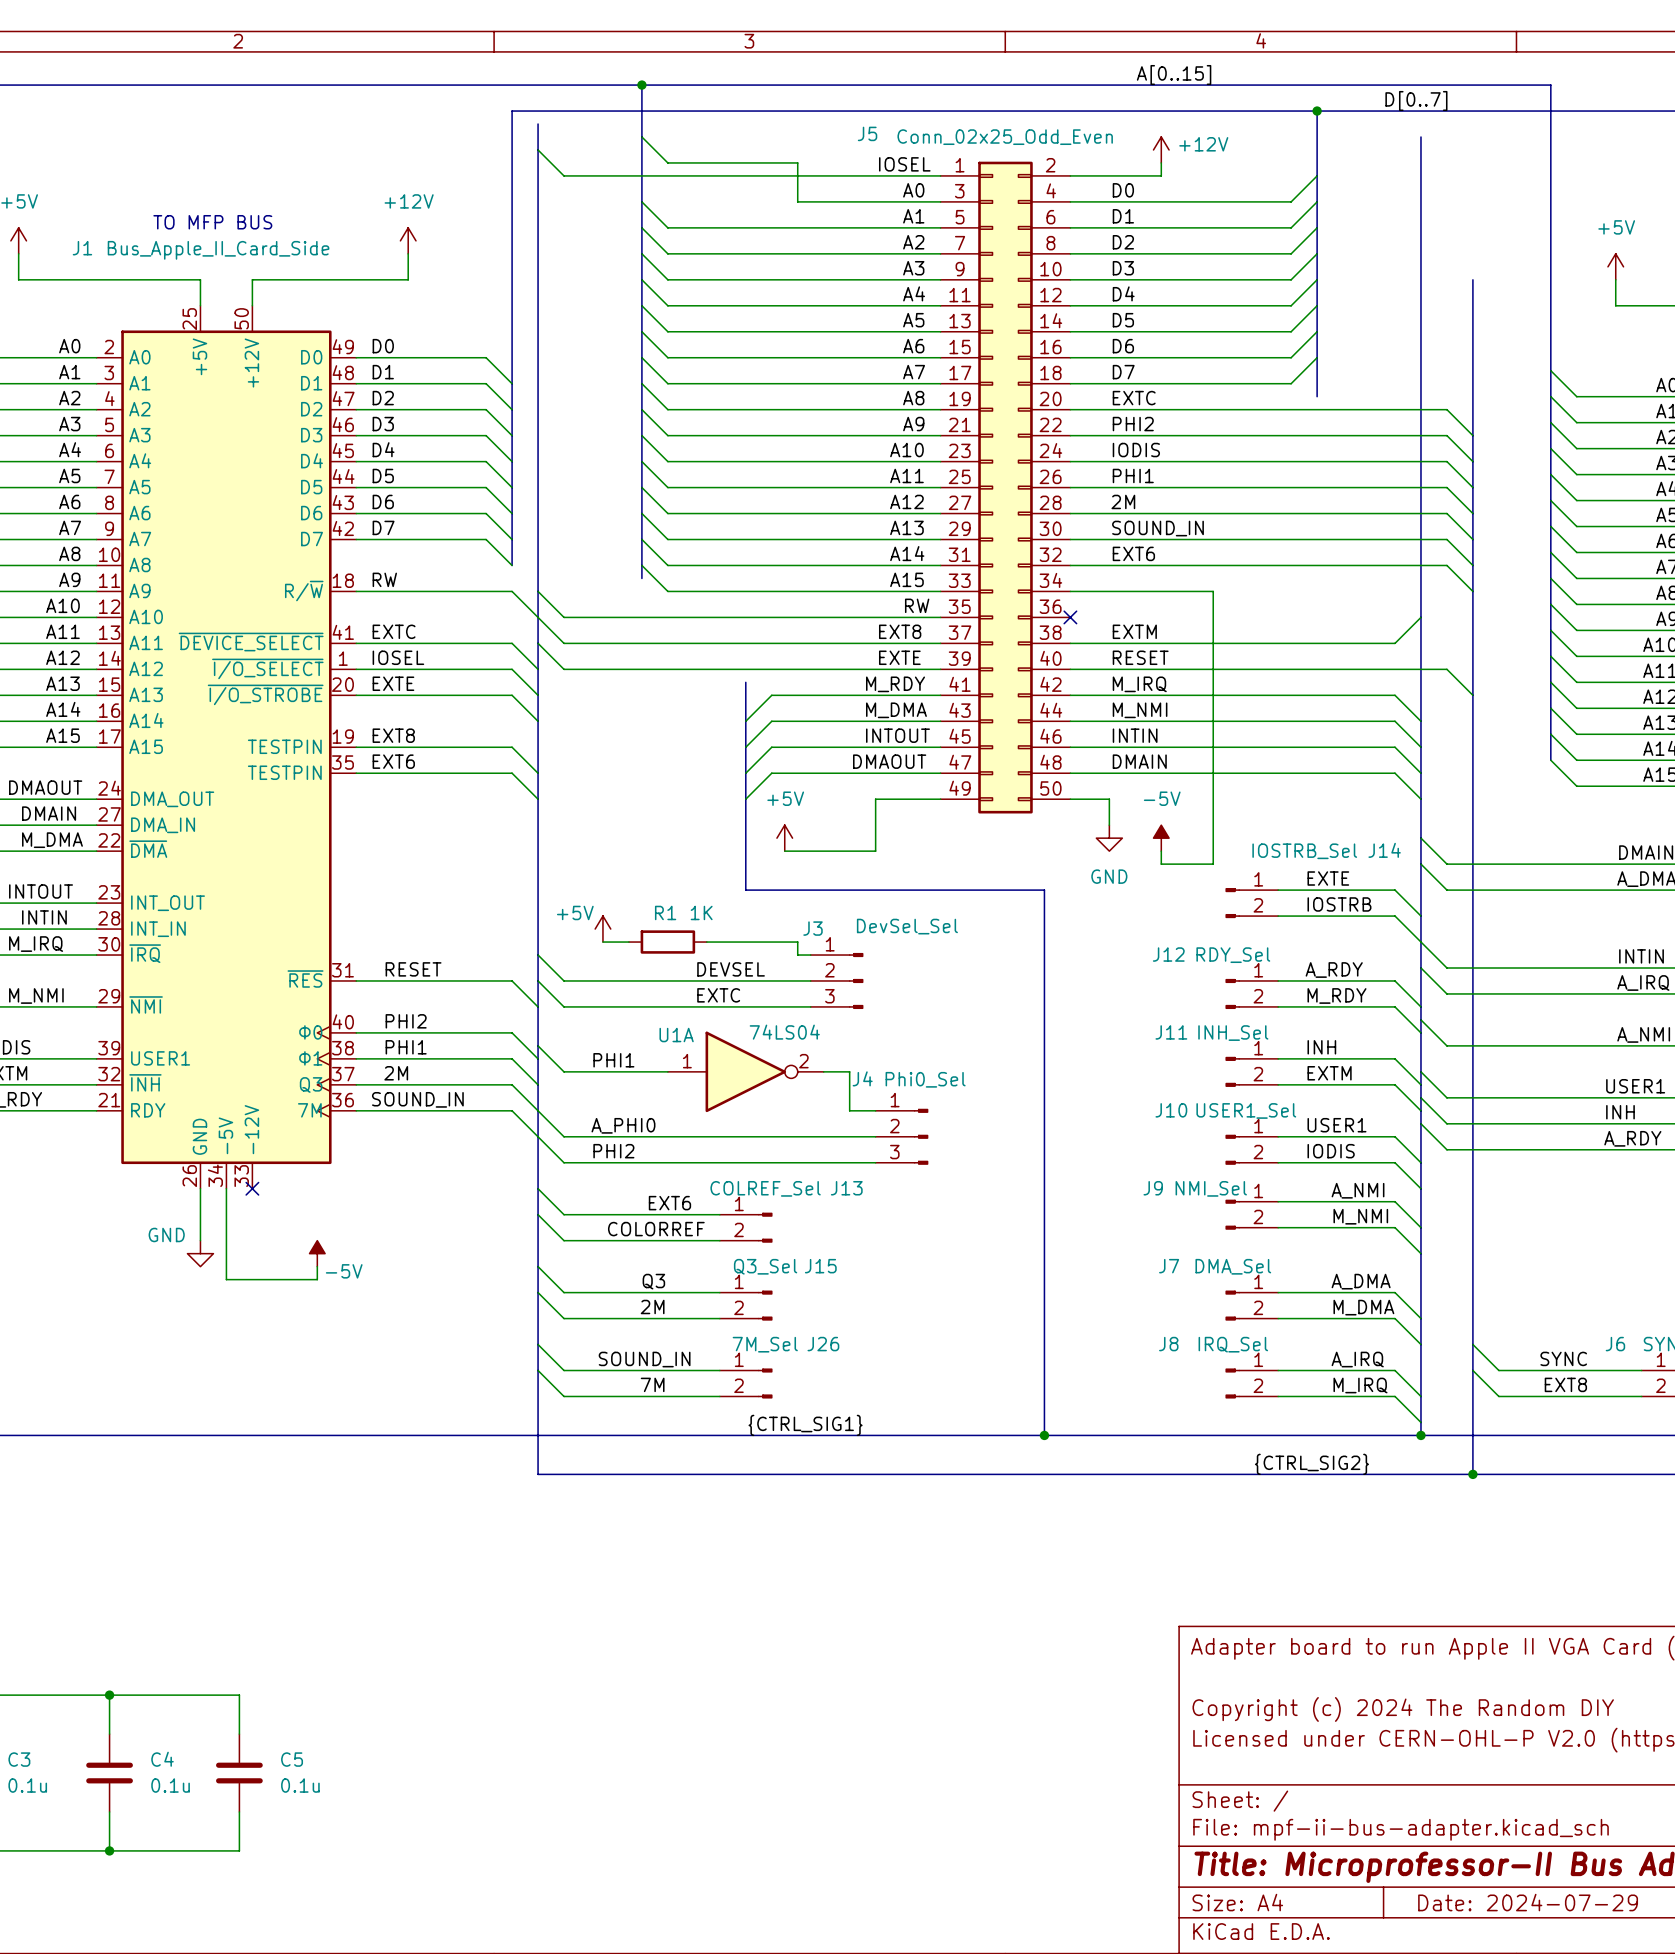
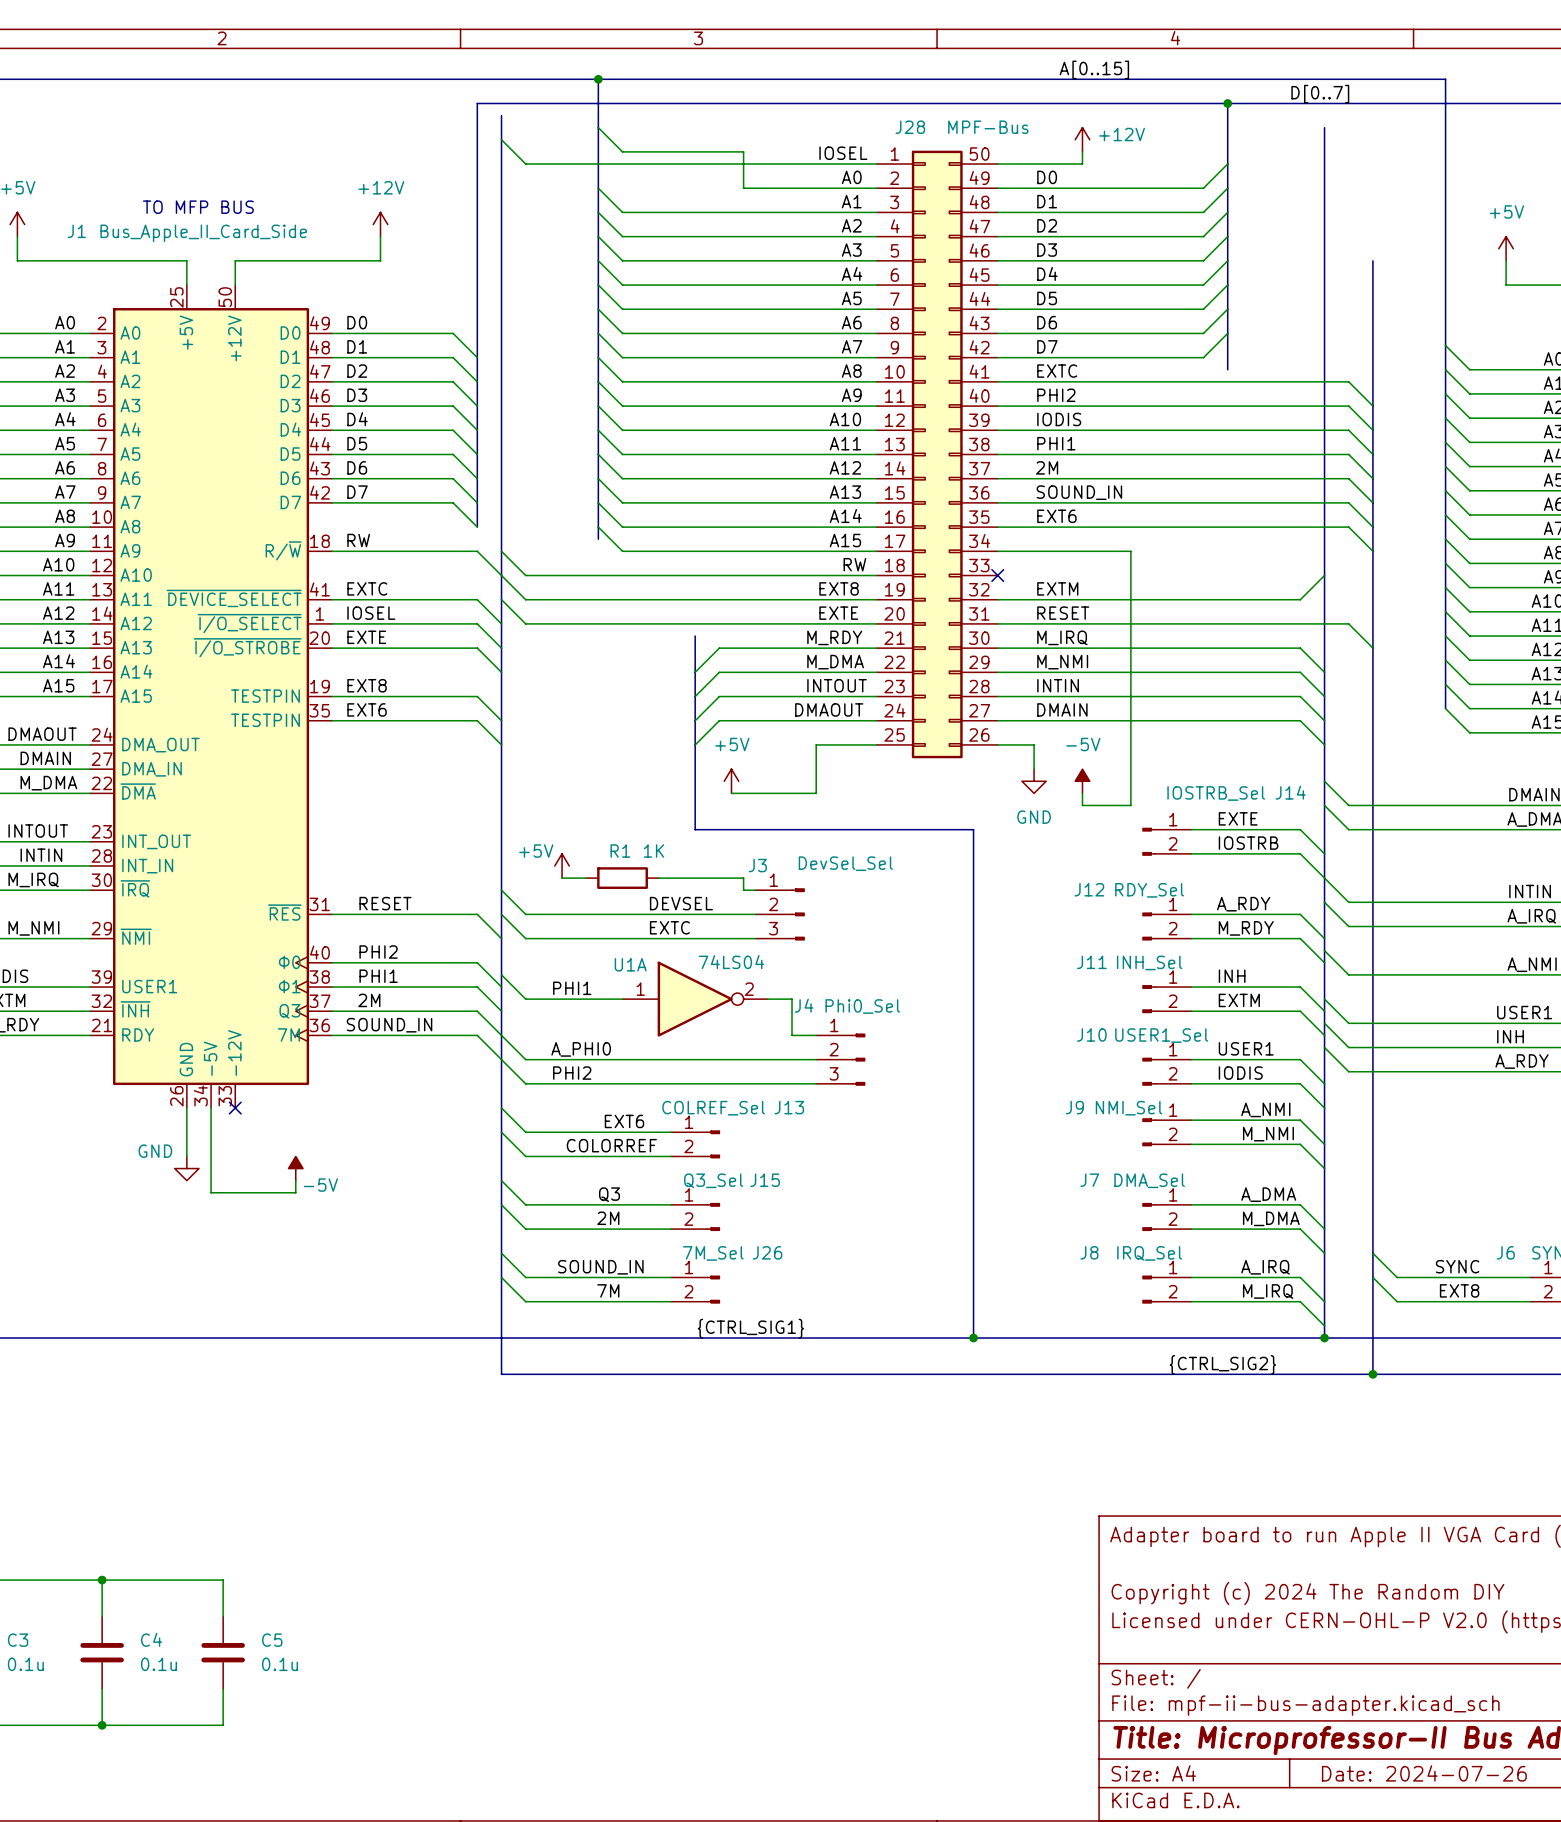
J5 name: J5 (867, 133) -> J28 (910, 127)
J5 value: Conn_02x25_Odd_Even (1005, 137) -> MPF-Bus (988, 127)
J5 symbol: [940, 161, 1071, 814] -> [876, 150, 998, 759]
title block: Date: 2024-07-29 (1528, 1902) -> Date: 2024-07-26 (1424, 1773)

